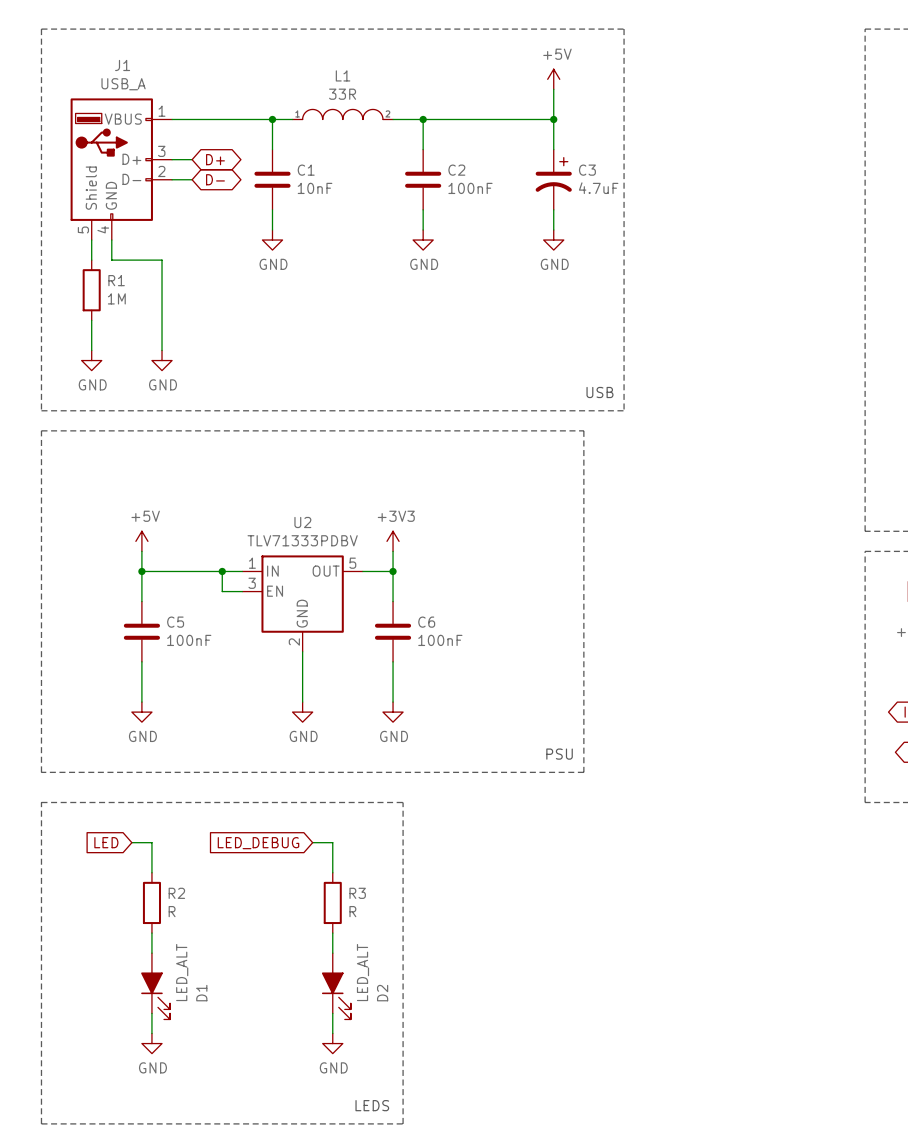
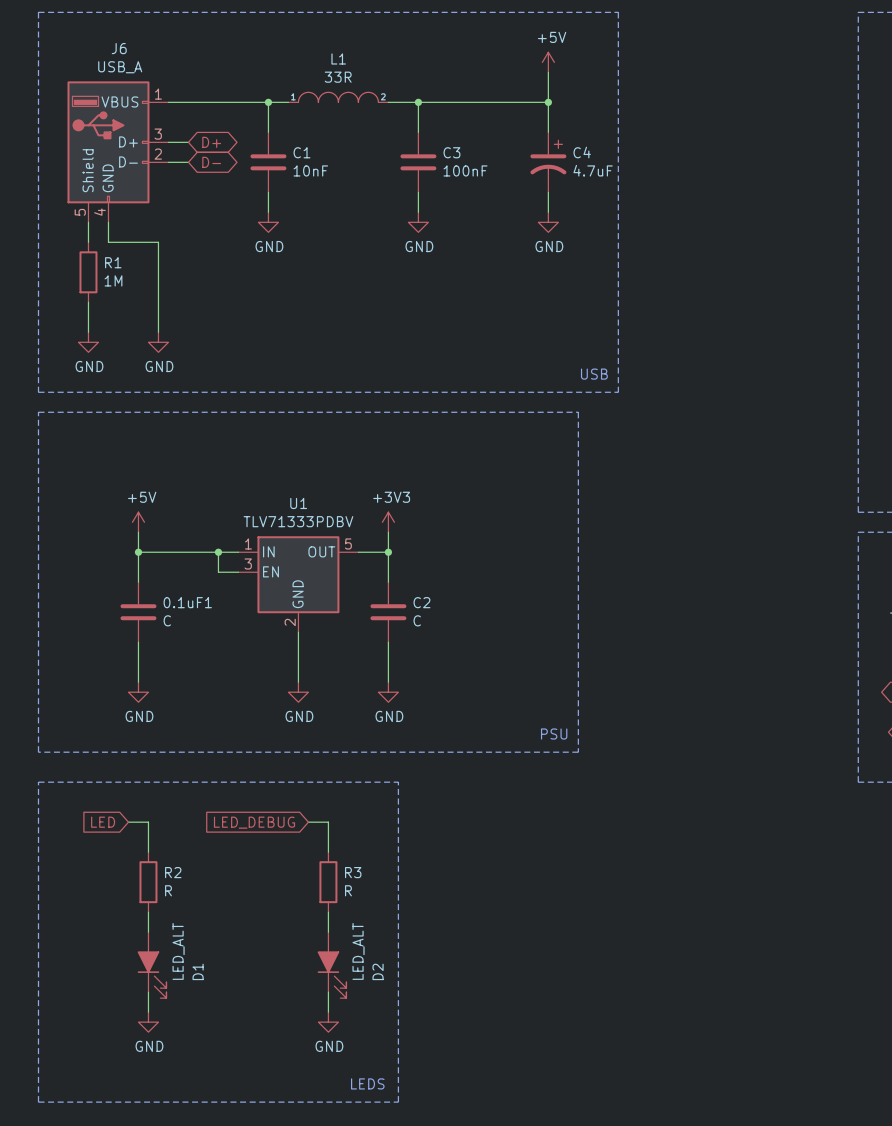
J1 name: J1 (122, 65) -> J6 (119, 48)
C2 name: C2 (456, 170) -> C3 (451, 152)
C3 name: C3 (587, 170) -> C4 (582, 152)
U2 name: U2 (302, 522) -> U1 (298, 503)
C5 name: C5 (175, 622) -> 0.1uF1 (187, 602)
C6 name: C6 (426, 622) -> C2 (421, 602)
C5 value: 100nF (189, 640) -> C (167, 620)
C6 value: 100nF (440, 640) -> C (417, 620)

